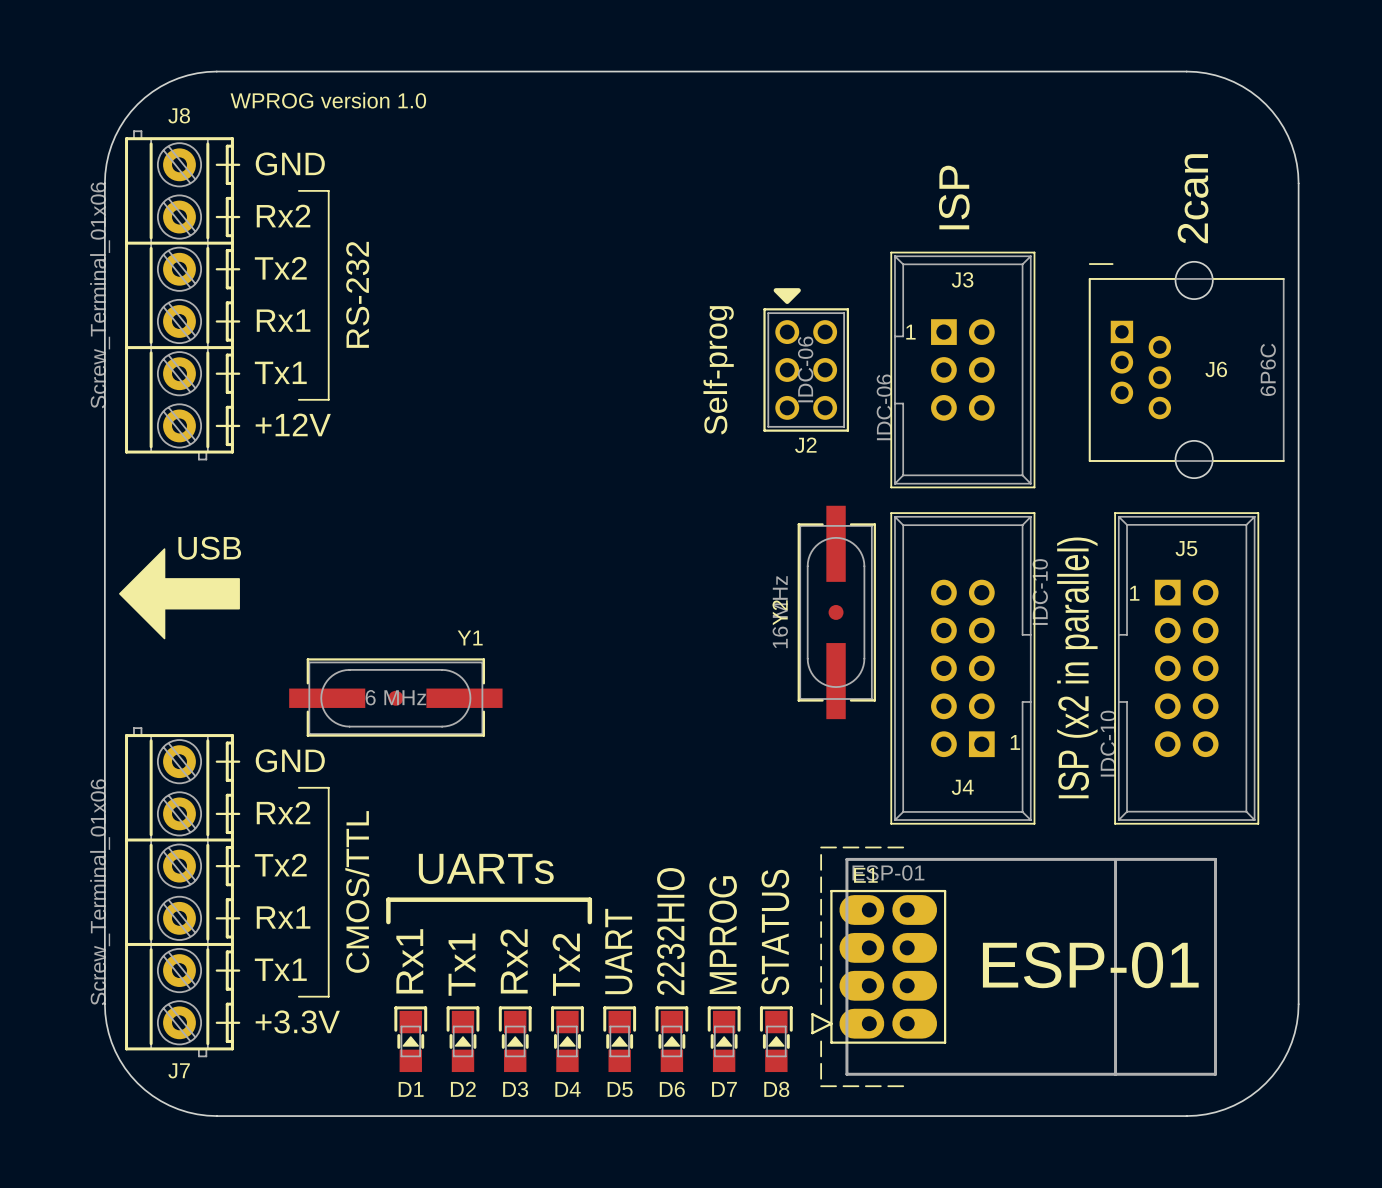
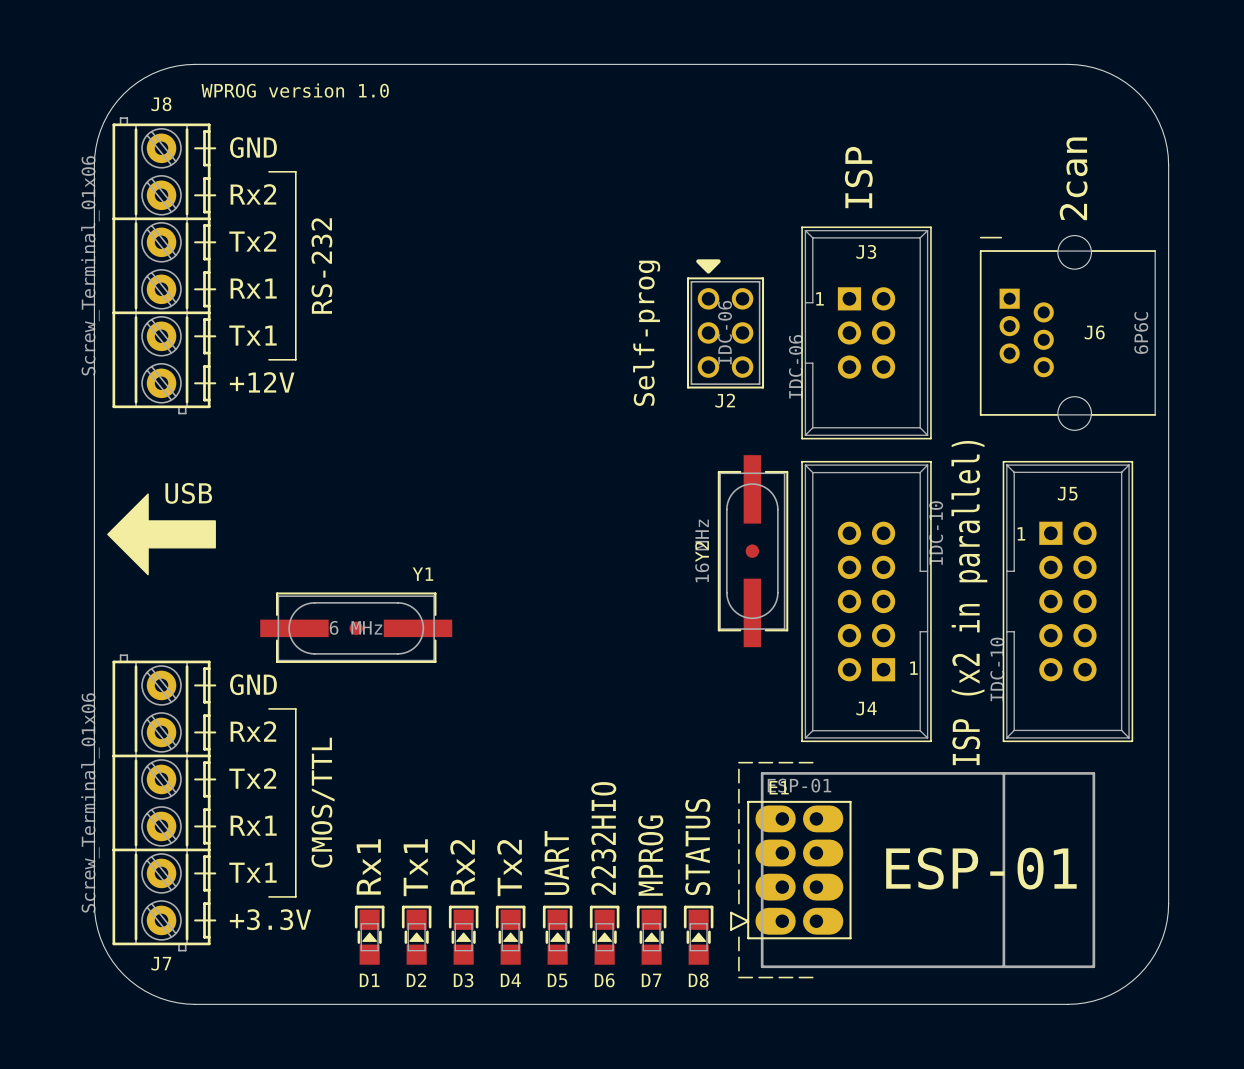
text: UARTs (486, 868) -> none
line: (388, 922) (388, 899) (589, 899) (589, 922) -> none

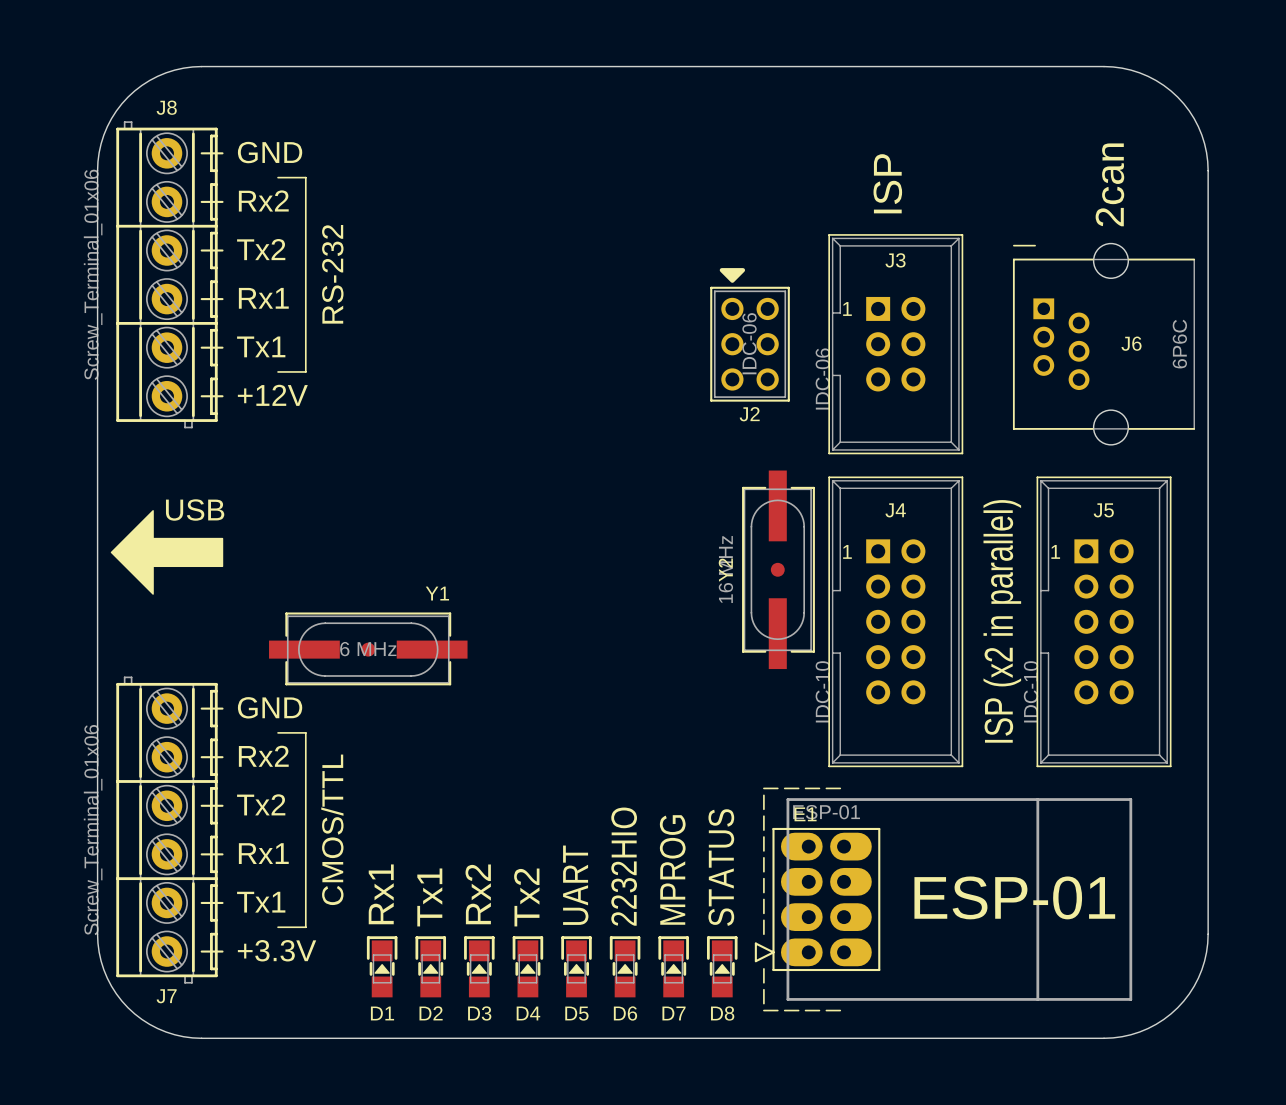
text: WPROG version 1.0 (295, 90) -> none
text: Self-prog (646, 333) -> none
J4 rotation: 0° (866, 601) -> 180° (895, 621)

